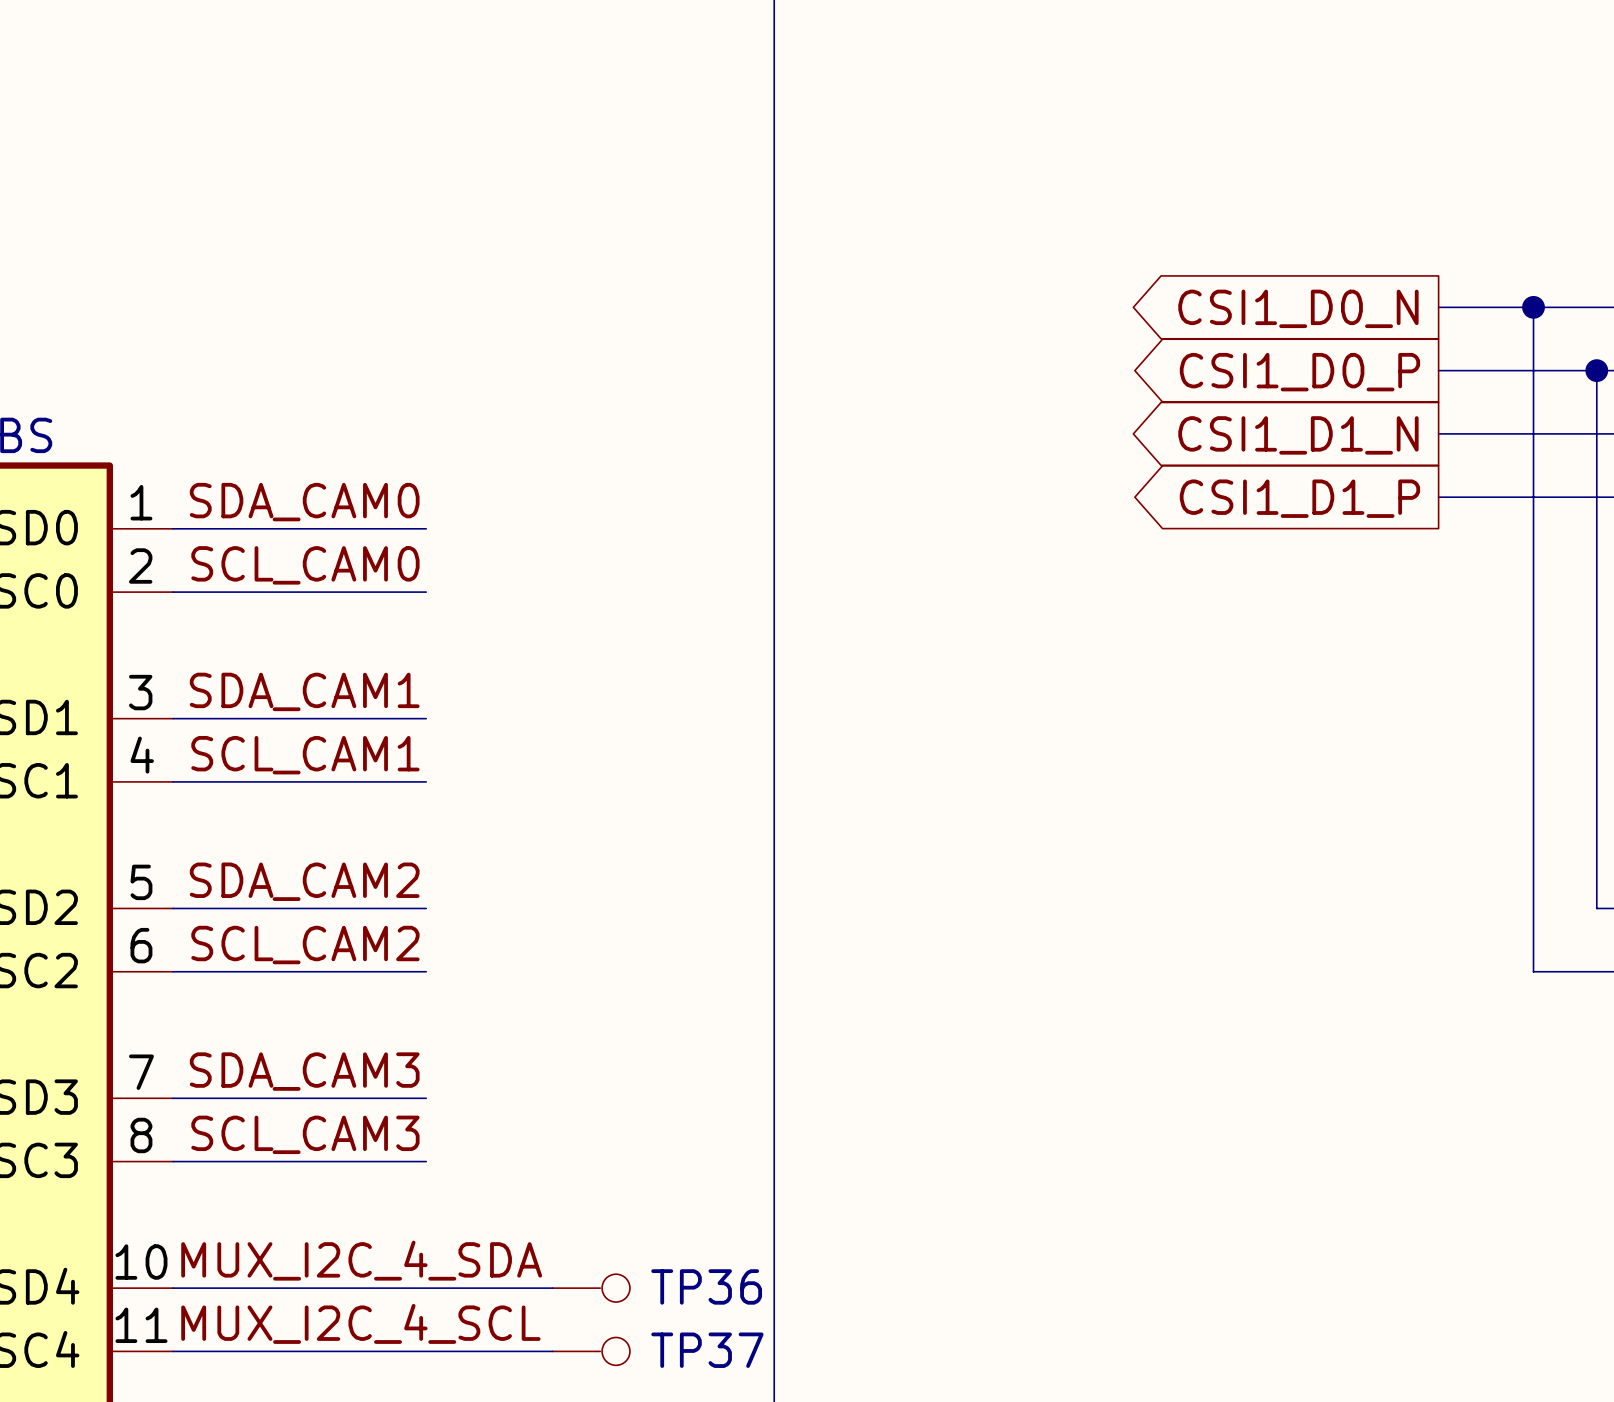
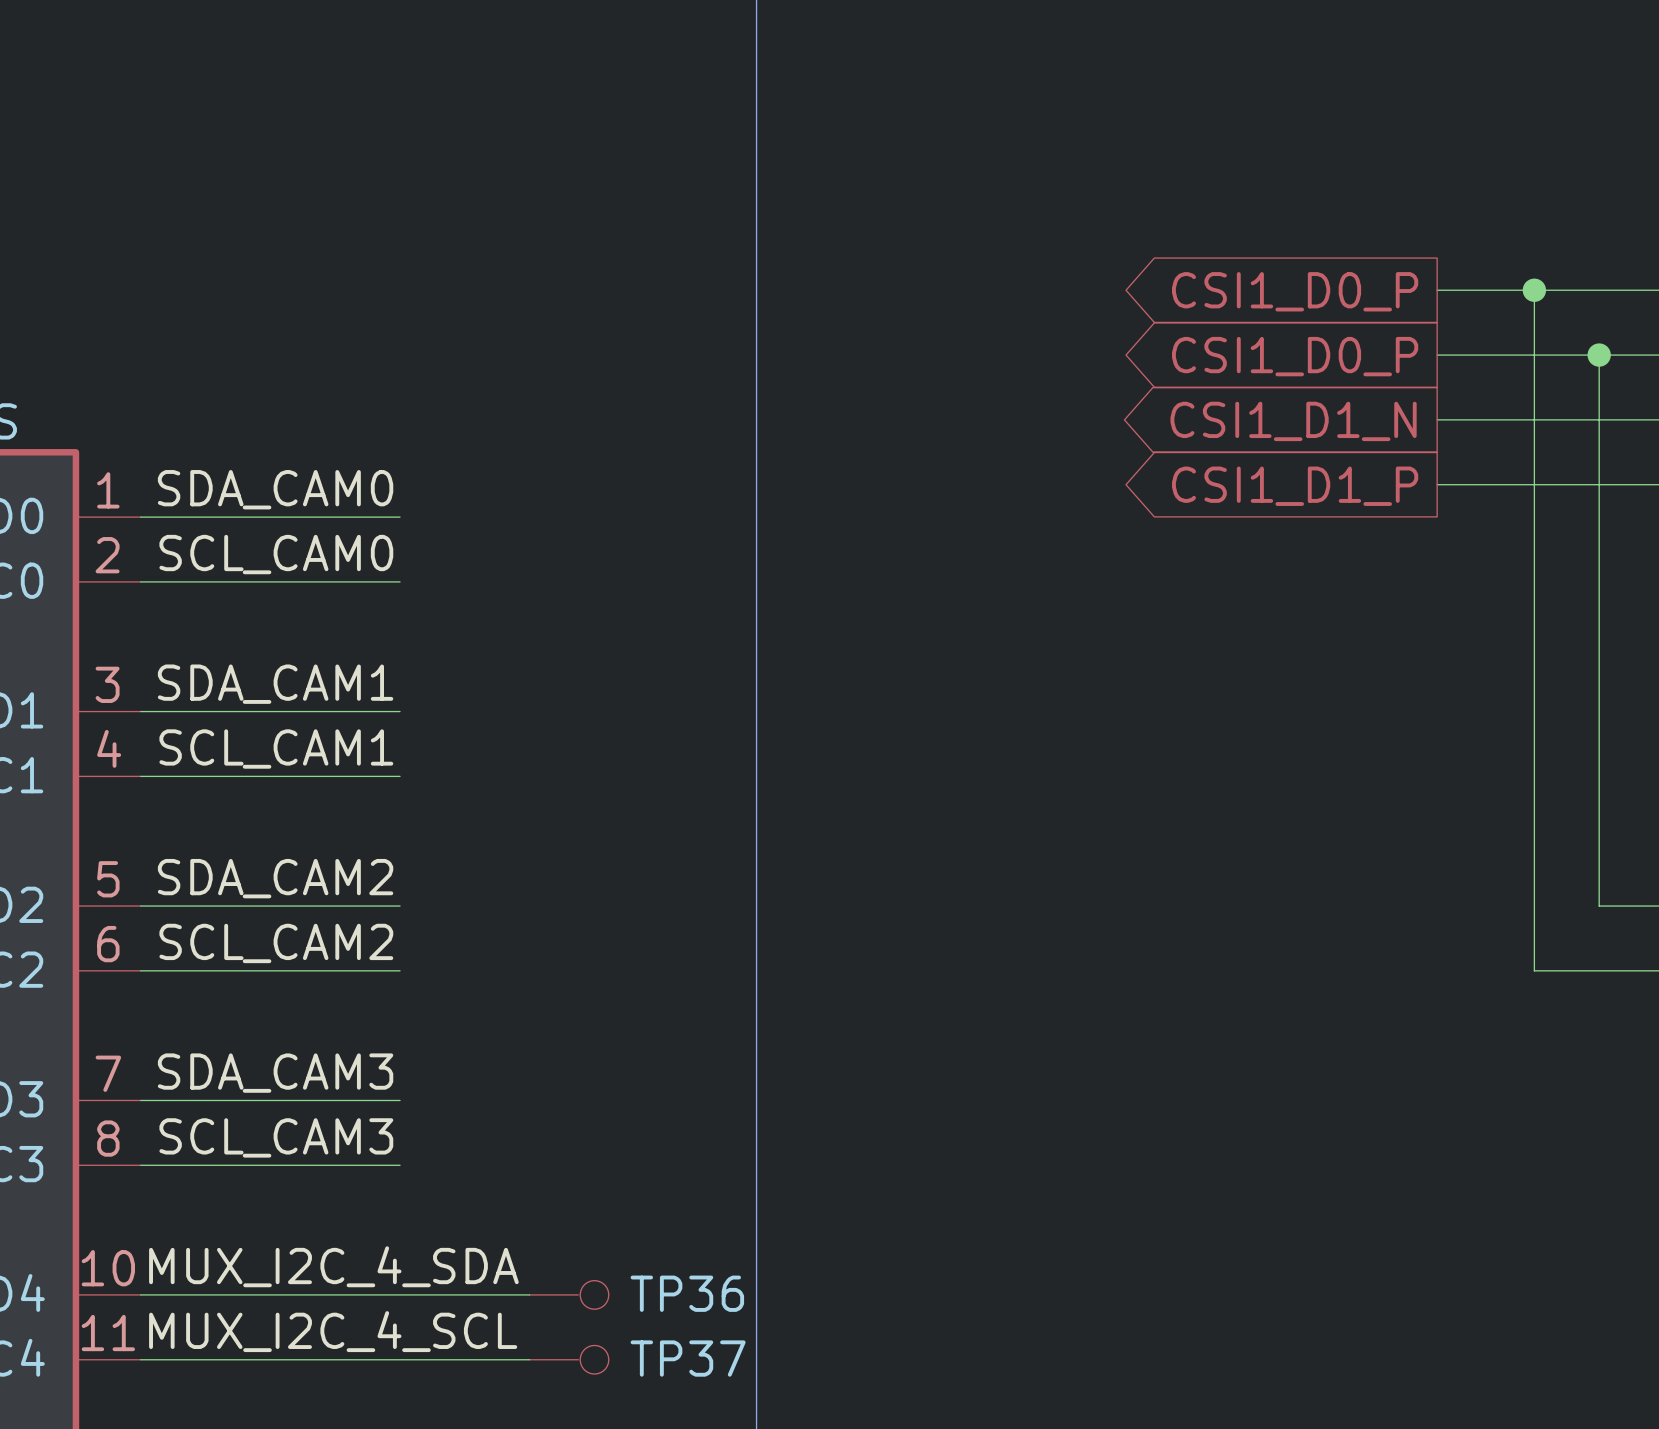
global label: CSI1_D0_N (1298, 308) -> CSI1_D0_P (1295, 291)

